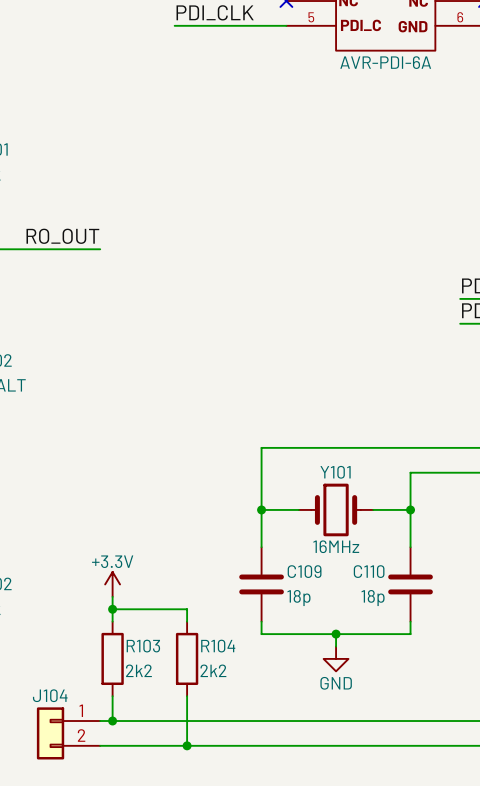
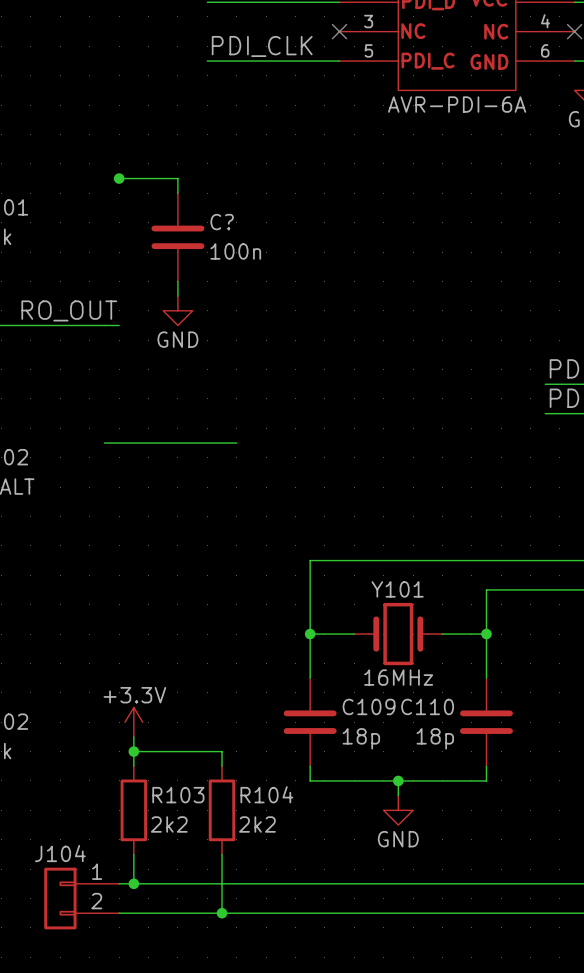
wire: none -> (119, 178) (177, 178) (177, 193)
junction: none -> (119, 178)
C?: none -> 100n (177, 237)
wire: none -> (177, 281) (177, 296)
power symbol: none -> GND (177, 310)
wire: none -> (104, 443) (236, 443)

